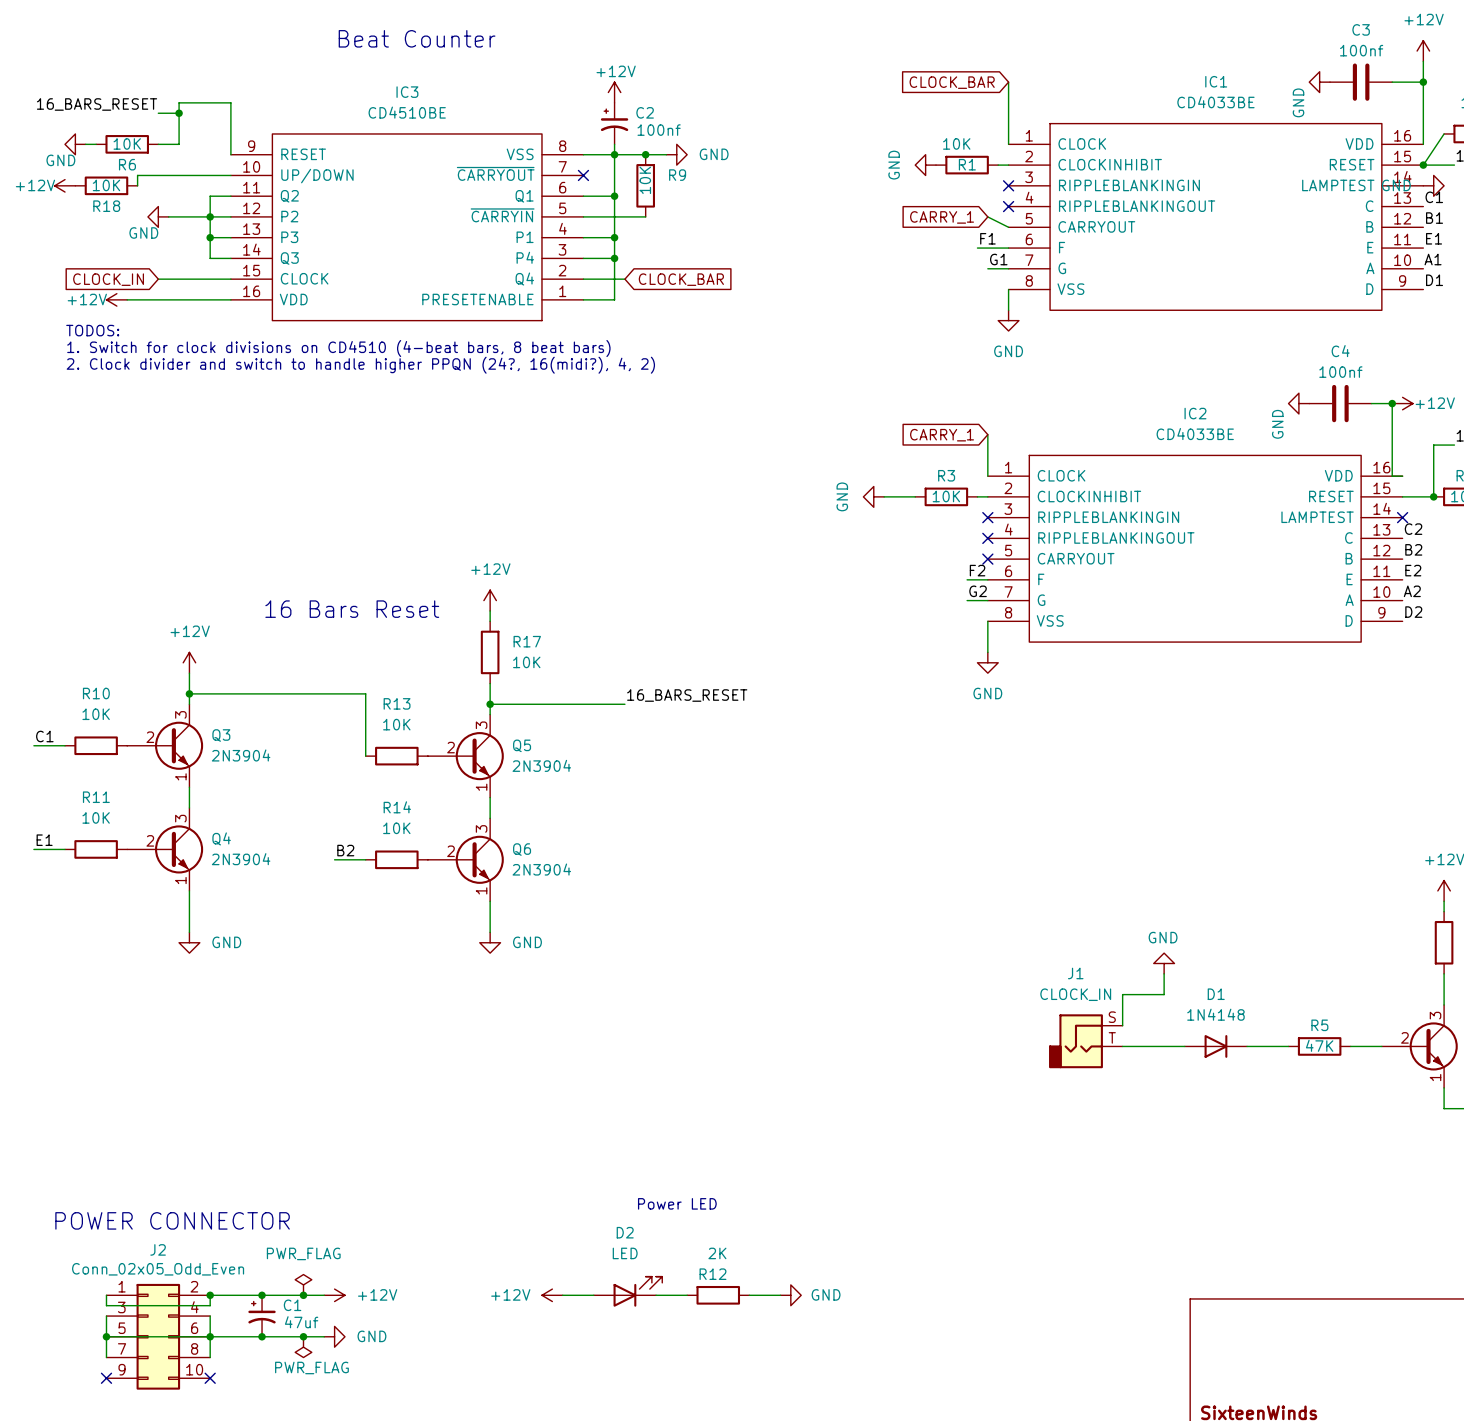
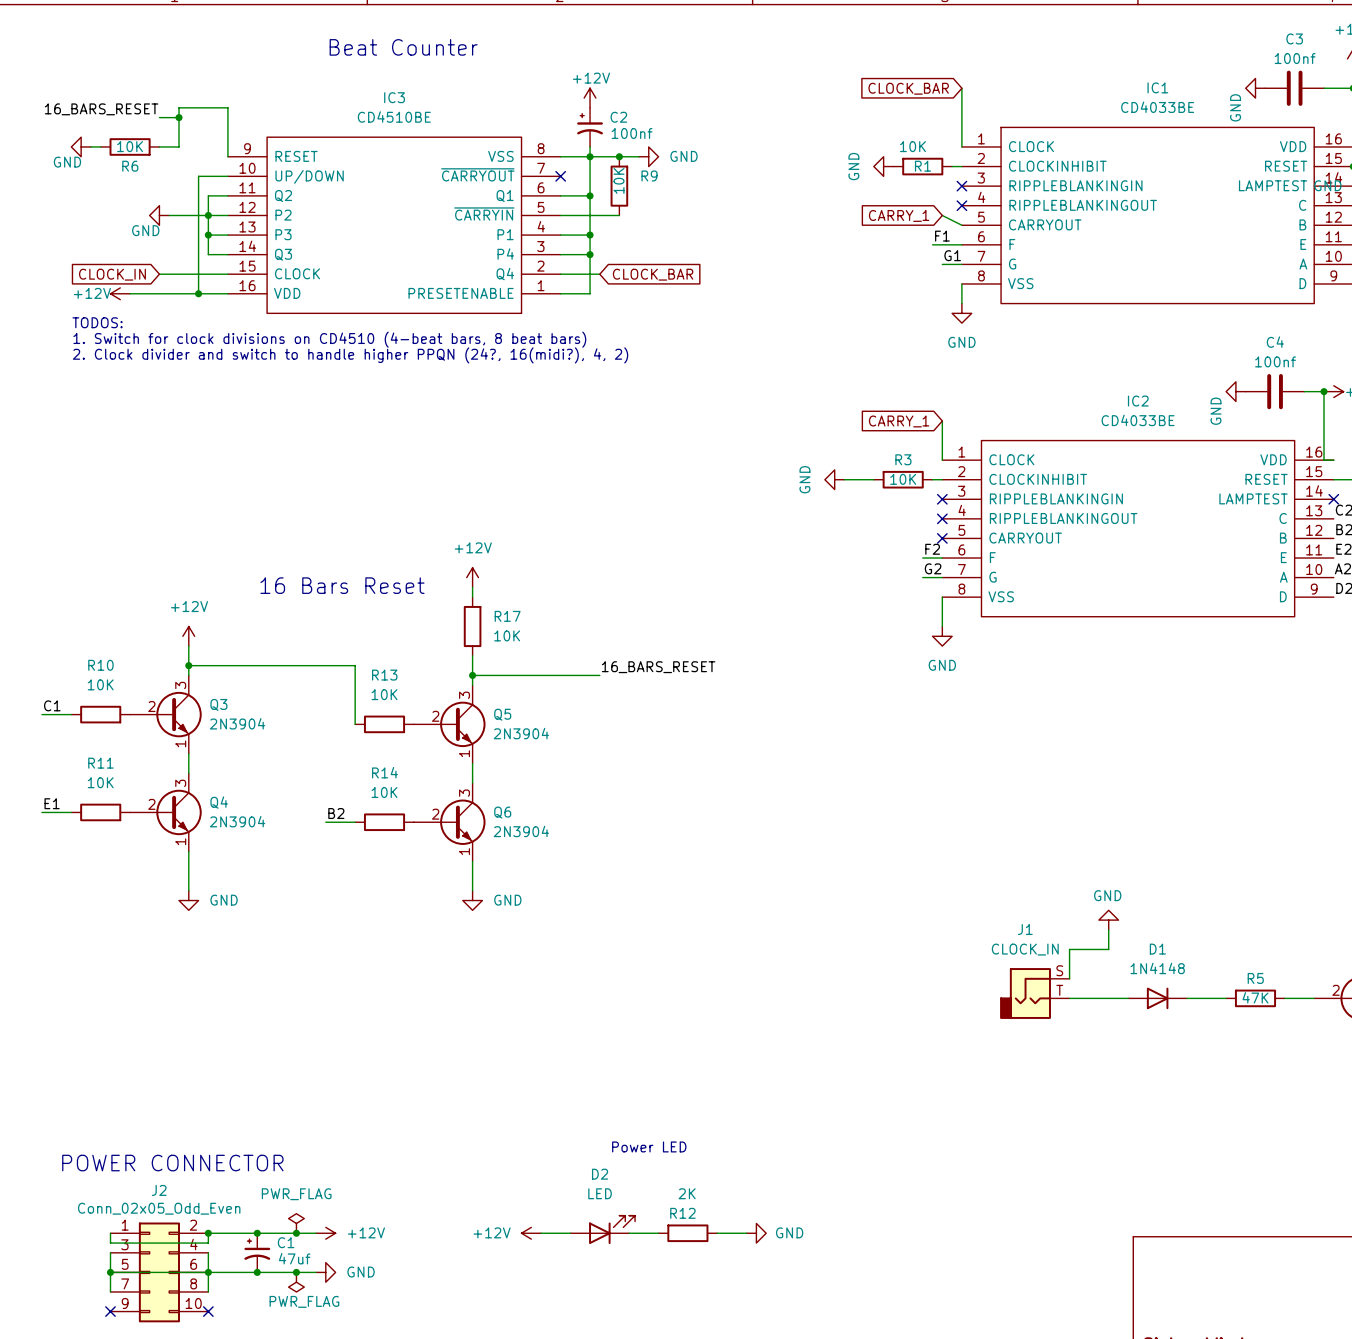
wire: (199, 175) (137, 175) (137, 185) -> (198, 176) (198, 293)
power symbol: +12V (65, 185) -> none
R18: 10K (106, 185) -> none
junction: none -> (198, 293)

